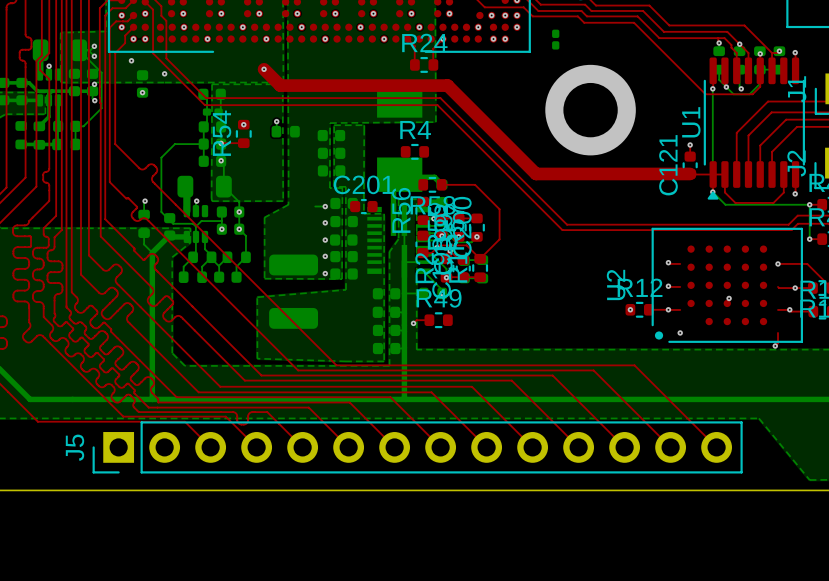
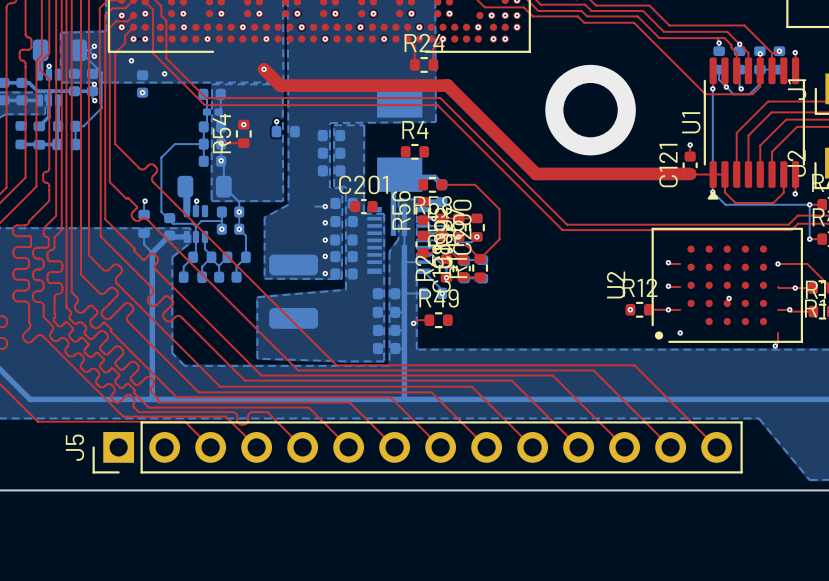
part: (555, 39) -> none

